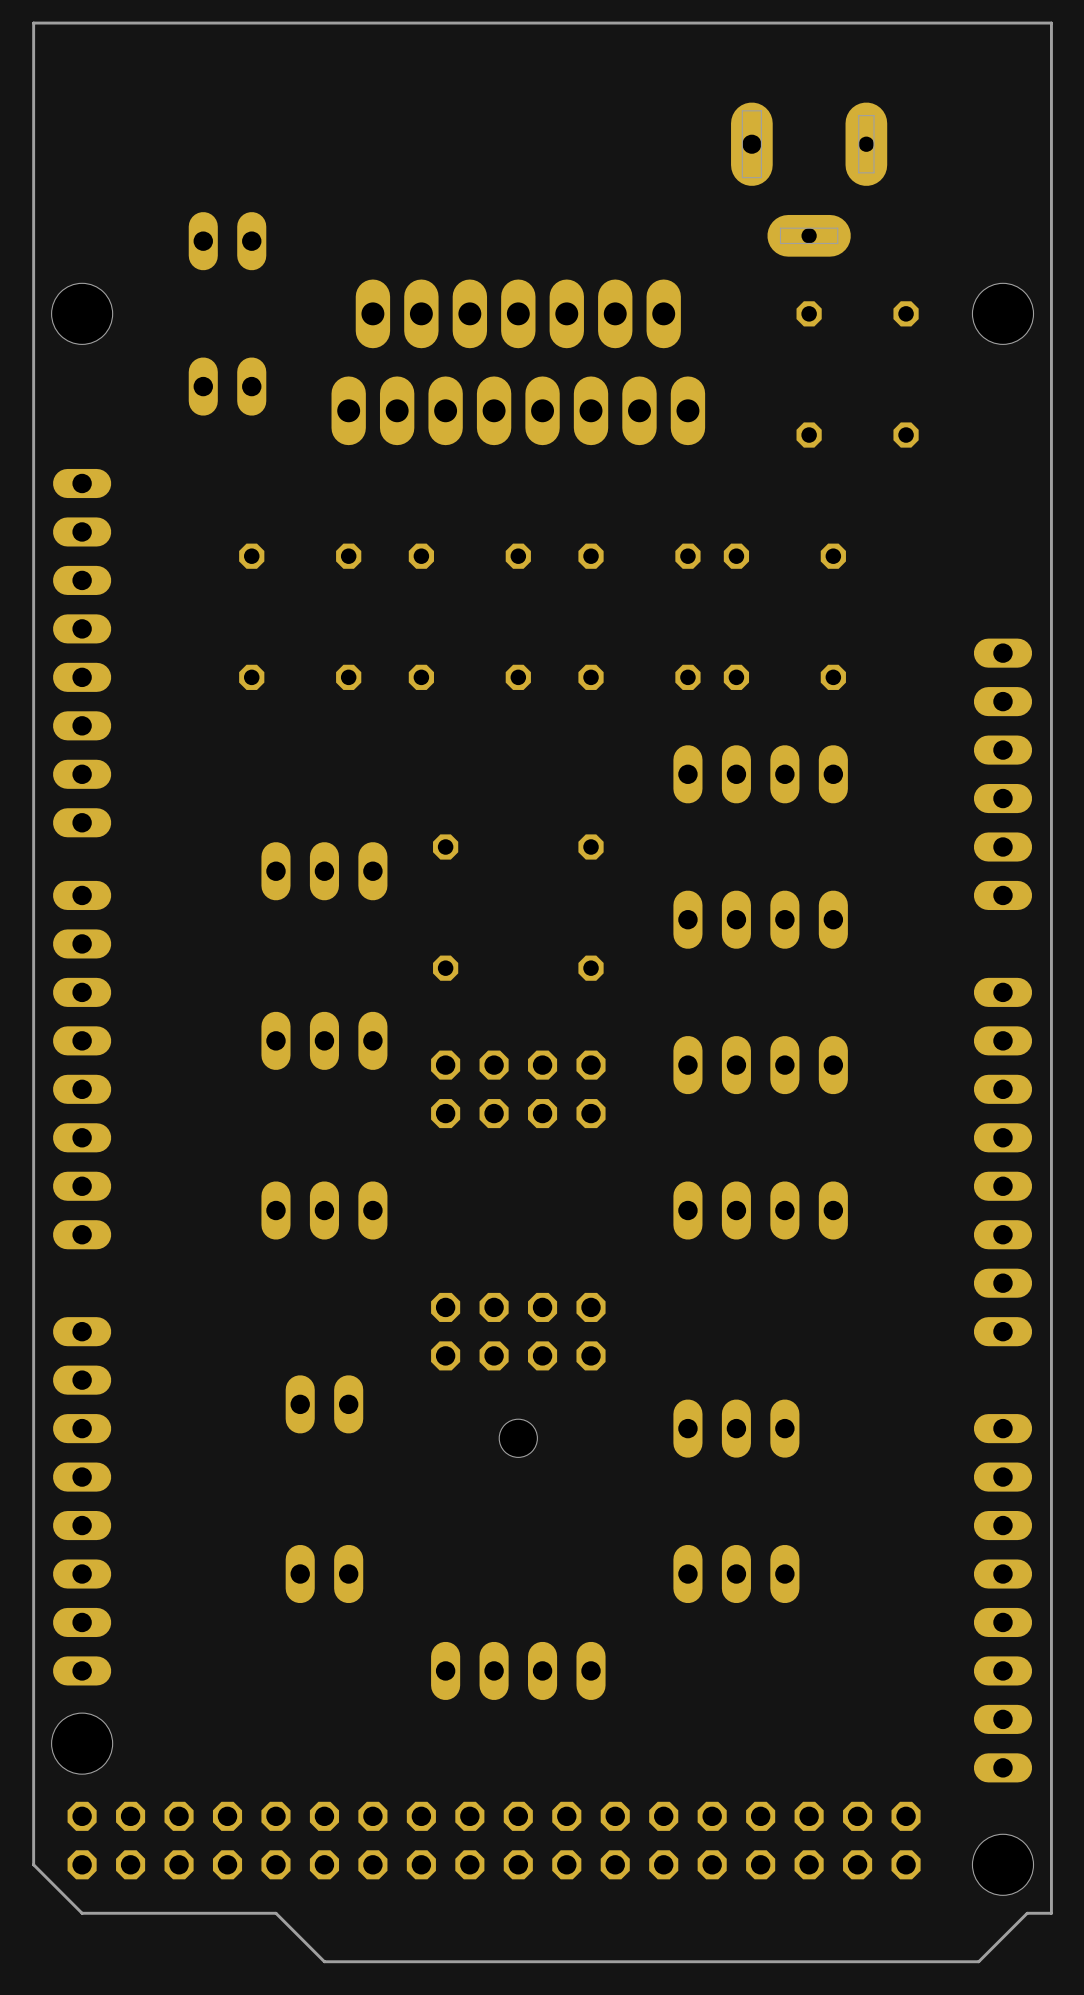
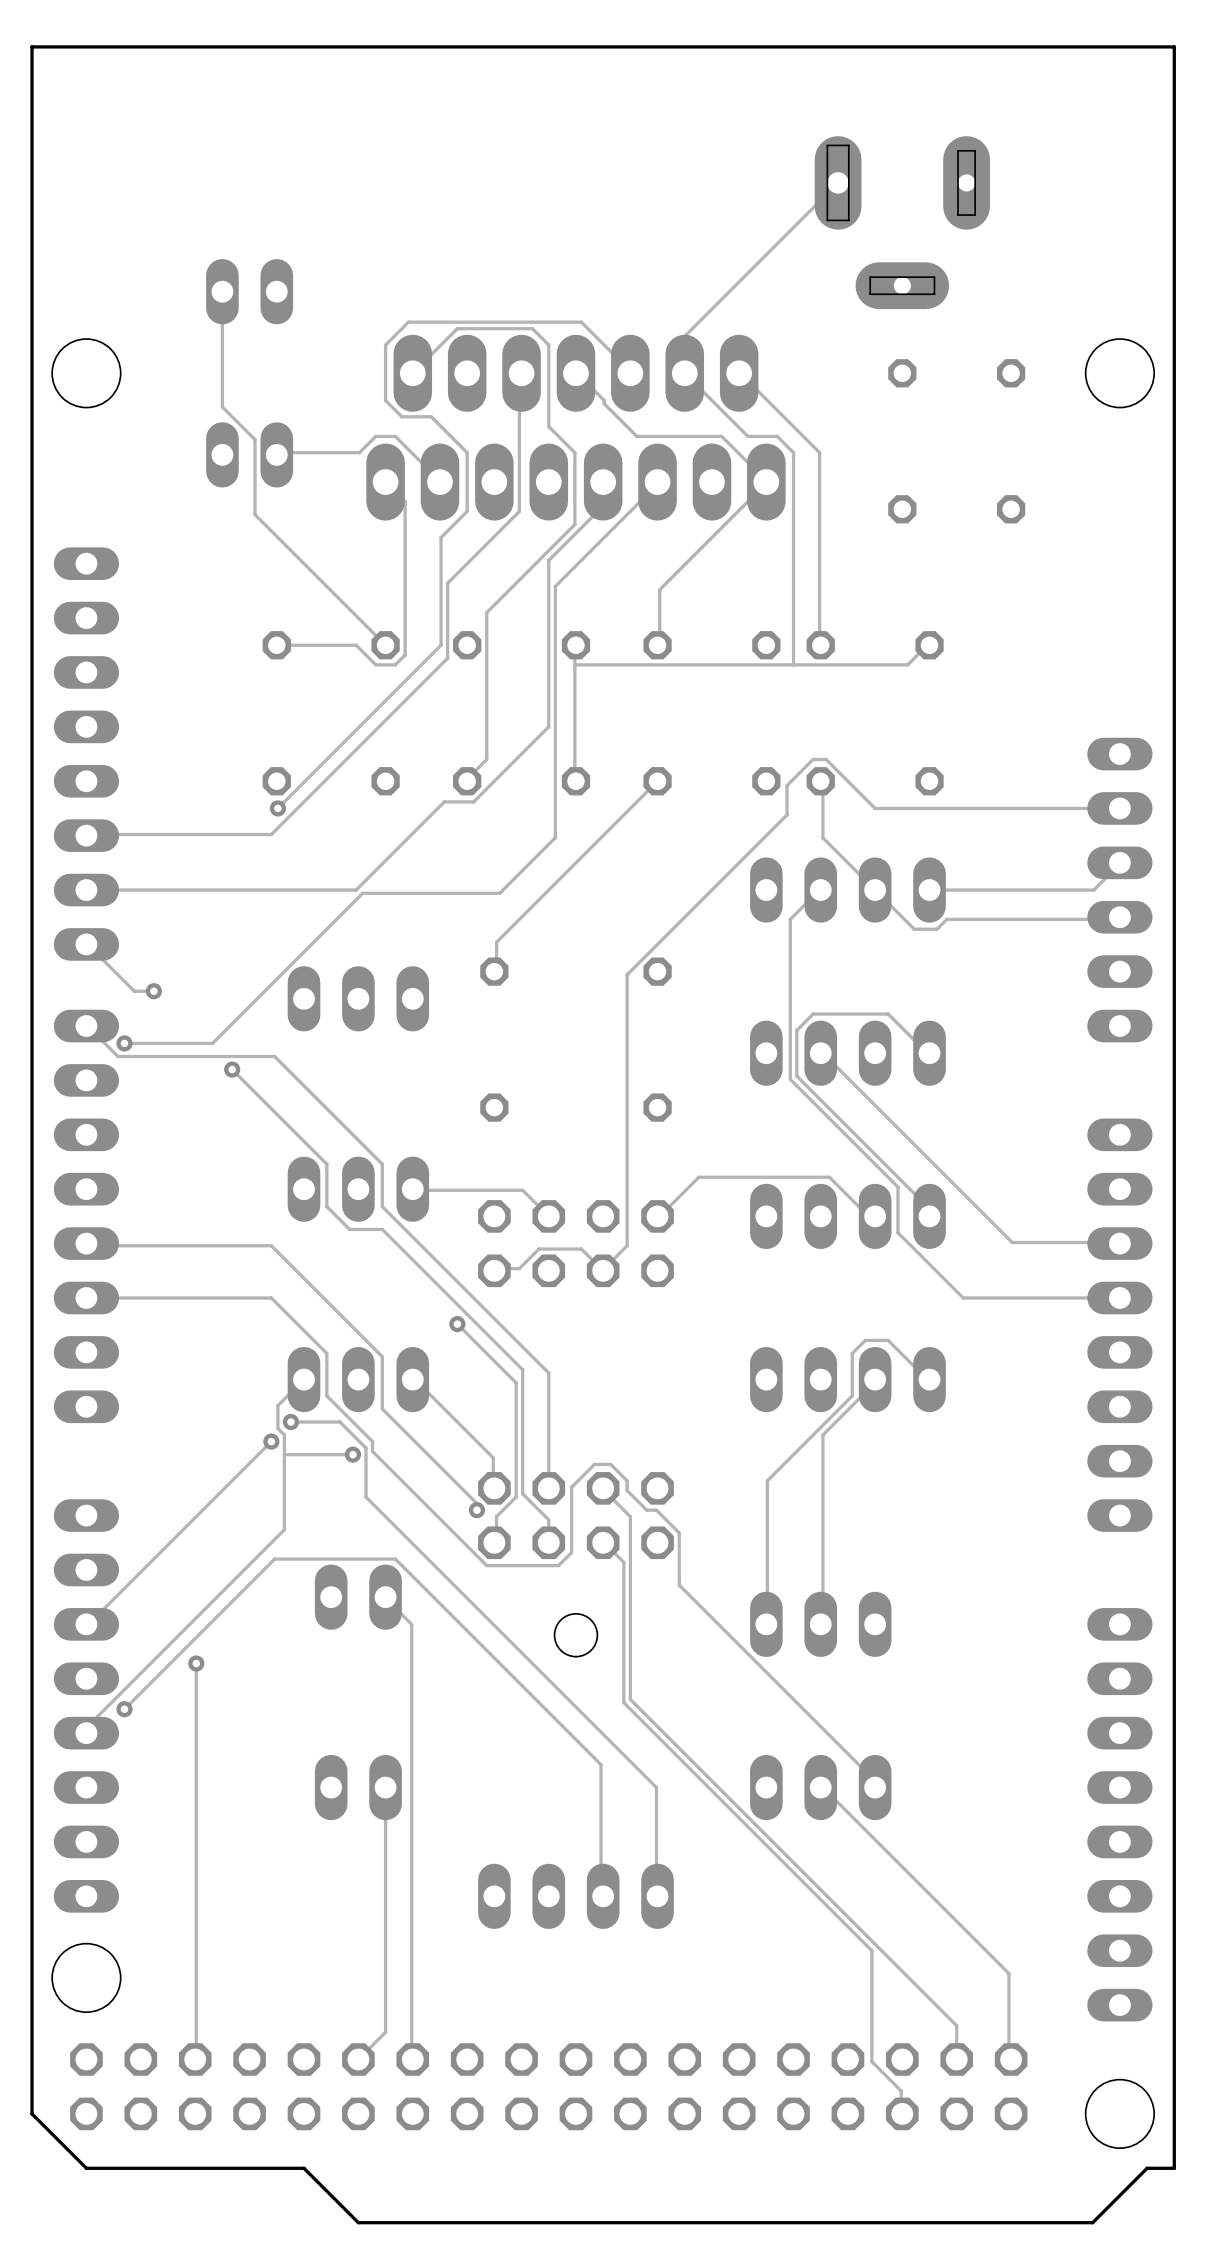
track: none -> (838, 182) (685, 335) (684, 373) (747, 436) (777, 436) (793, 452) (793, 664)
track: none -> (222, 291) (222, 407) (255, 439) (255, 514) (385, 645)
track: none -> (412, 373) (457, 328) (532, 328) (548, 345) (548, 426) (574, 452) (574, 524) (486, 612) (486, 759) (467, 781)
track: none -> (521, 373) (519, 374) (519, 511) (447, 583) (447, 658) (271, 834) (86, 835)
track: none -> (575, 373) (636, 436) (721, 436) (767, 482)
track: none -> (630, 373) (630, 371) (581, 322) (408, 322) (385, 345) (385, 400) (401, 416) (431, 416) (467, 452) (467, 511) (441, 537) (441, 645) (277, 808)
track: none -> (739, 373) (819, 452) (820, 645)
track: none -> (276, 454) (277, 452) (359, 452) (375, 436) (395, 436) (439, 482)
track: none -> (385, 482) (405, 501) (405, 655) (395, 664) (375, 664) (356, 645) (276, 645)
track: none -> (603, 482) (600, 482) (600, 508) (548, 560) (548, 726) (473, 801) (444, 801) (356, 890) (86, 890)
track: none -> (657, 482) (659, 482) (555, 586) (555, 837) (499, 893) (362, 893) (212, 1043) (124, 1043)
track: none -> (767, 482) (659, 589) (659, 645) (657, 645)
track: none -> (575, 645) (575, 781)
track: none -> (929, 645) (907, 664) (574, 664)
track: none -> (657, 781) (496, 942) (496, 971) (494, 971)
track: none -> (820, 781) (822, 782) (822, 837) (914, 929) (937, 929) (946, 919) (1119, 919) (1119, 917)
via: none -> (277, 808)
track: none -> (1119, 808) (875, 808) (826, 759) (813, 759) (787, 785) (787, 814) (627, 974) (627, 1245) (603, 1270) (581, 1249) (538, 1249) (519, 1268) (496, 1268) (494, 1270)
track: none -> (1119, 862) (1093, 890) (929, 890)
track: none -> (820, 890) (790, 919) (790, 1079) (897, 1187) (897, 1232) (963, 1297) (1119, 1297)
track: none -> (86, 944) (134, 991) (153, 991)
via: none -> (153, 991)
track: none -> (86, 1026) (117, 1056) (274, 1056) (382, 1164) (382, 1206) (548, 1373) (548, 1488)
via: none -> (124, 1043)
track: none -> (820, 1053) (822, 1053) (1012, 1242) (1119, 1243)
track: none -> (929, 1053) (888, 1014) (813, 1014) (796, 1030) (796, 1076) (927, 1206) (927, 1216) (929, 1216)
track: none -> (232, 1069) (326, 1164) (326, 1206) (349, 1229) (382, 1229) (522, 1369) (522, 1493) (548, 1519) (548, 1542)
via: none -> (232, 1069)
track: none -> (412, 1189) (522, 1190) (548, 1216)
track: none -> (875, 1216) (868, 1216) (829, 1177) (698, 1177) (657, 1216)
track: none -> (86, 1243) (88, 1245) (271, 1245) (382, 1356) (382, 1408) (476, 1503) (476, 1510)
track: none -> (86, 1297) (271, 1297) (326, 1353) (326, 1395) (372, 1441) (372, 1451) (486, 1565) (558, 1565) (571, 1552) (571, 1487) (594, 1464) (610, 1464) (627, 1480) (627, 1490) (646, 1510) (656, 1510) (679, 1532) (679, 1585) (875, 1781) (875, 1787)
track: none -> (457, 1324) (516, 1382) (516, 1497) (496, 1516) (496, 1542) (494, 1542)
via: none -> (457, 1324)
track: none -> (304, 1379) (277, 1405) (277, 1428) (284, 1435) (284, 1529) (88, 1725) (88, 1732) (86, 1733)
track: none -> (412, 1379) (414, 1379) (493, 1457) (494, 1488)
track: none -> (875, 1379) (875, 1382) (822, 1435) (822, 1624) (820, 1624)
track: none -> (929, 1379) (888, 1340) (865, 1340) (852, 1353) (852, 1395) (767, 1480) (766, 1624)
track: none -> (290, 1422) (339, 1422) (366, 1448) (366, 1497) (656, 1787) (657, 1896)
via: none -> (290, 1422)
track: none -> (271, 1441) (88, 1624) (86, 1624)
via: none -> (271, 1441)
track: none -> (352, 1454) (284, 1454)
via: none -> (352, 1454)
track: none -> (603, 1488) (630, 1516) (630, 1699) (956, 2025) (956, 2059)
via: none -> (476, 1510)
track: none -> (603, 1542) (623, 1562) (623, 1702) (871, 1950) (871, 2061) (901, 2091) (902, 2113)
track: none -> (385, 1597) (411, 1624) (412, 2059)
track: none -> (196, 1663) (195, 2059)
via: none -> (196, 1663)
track: none -> (124, 1709) (274, 1559) (395, 1559) (600, 1764) (600, 1895) (603, 1896)
via: none -> (124, 1709)
track: none -> (385, 1787) (385, 2032) (358, 2059)
track: none -> (820, 1787) (822, 1787) (1008, 1973) (1008, 2058) (1011, 2059)

